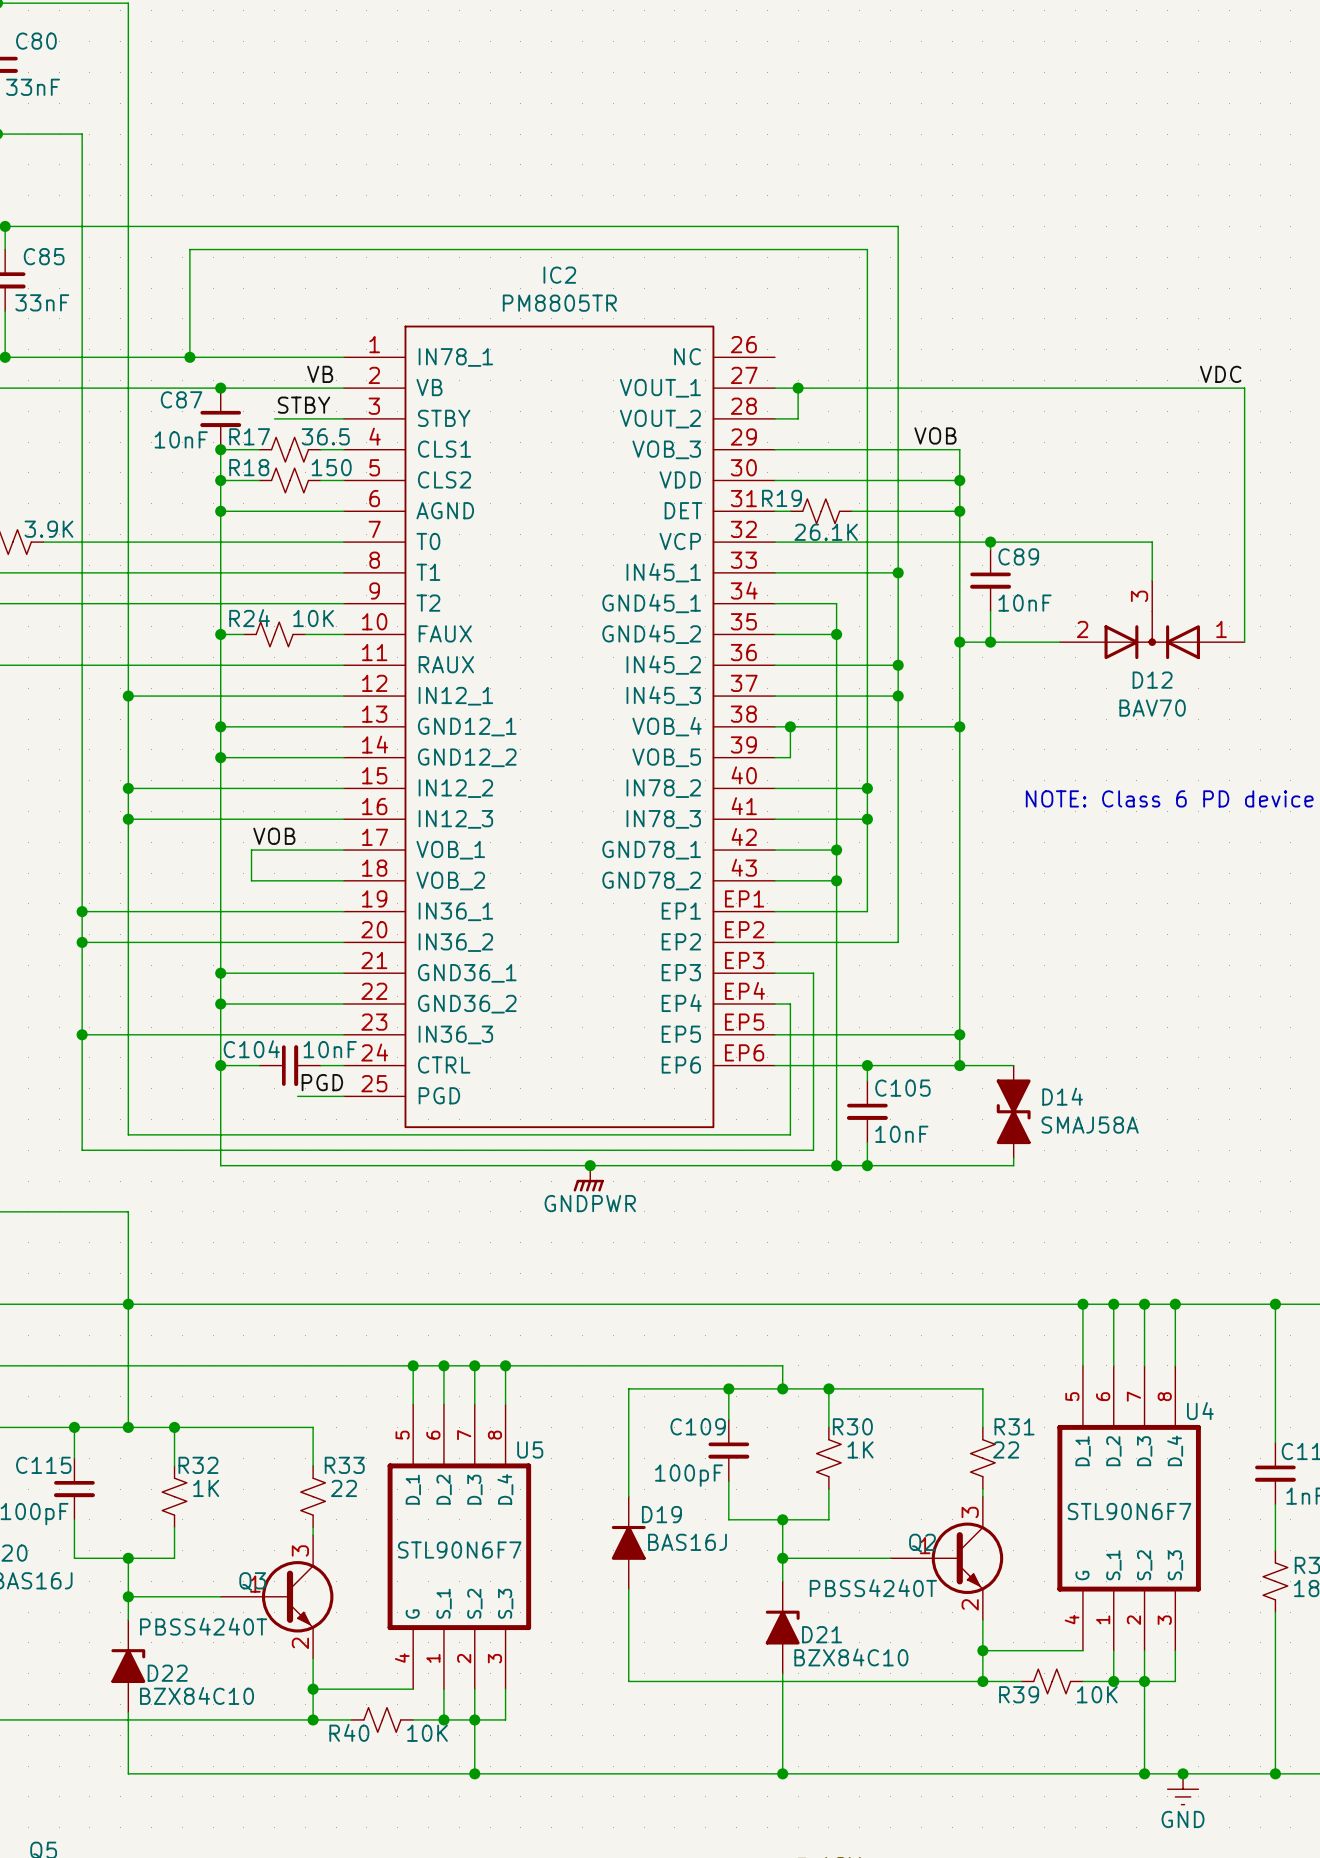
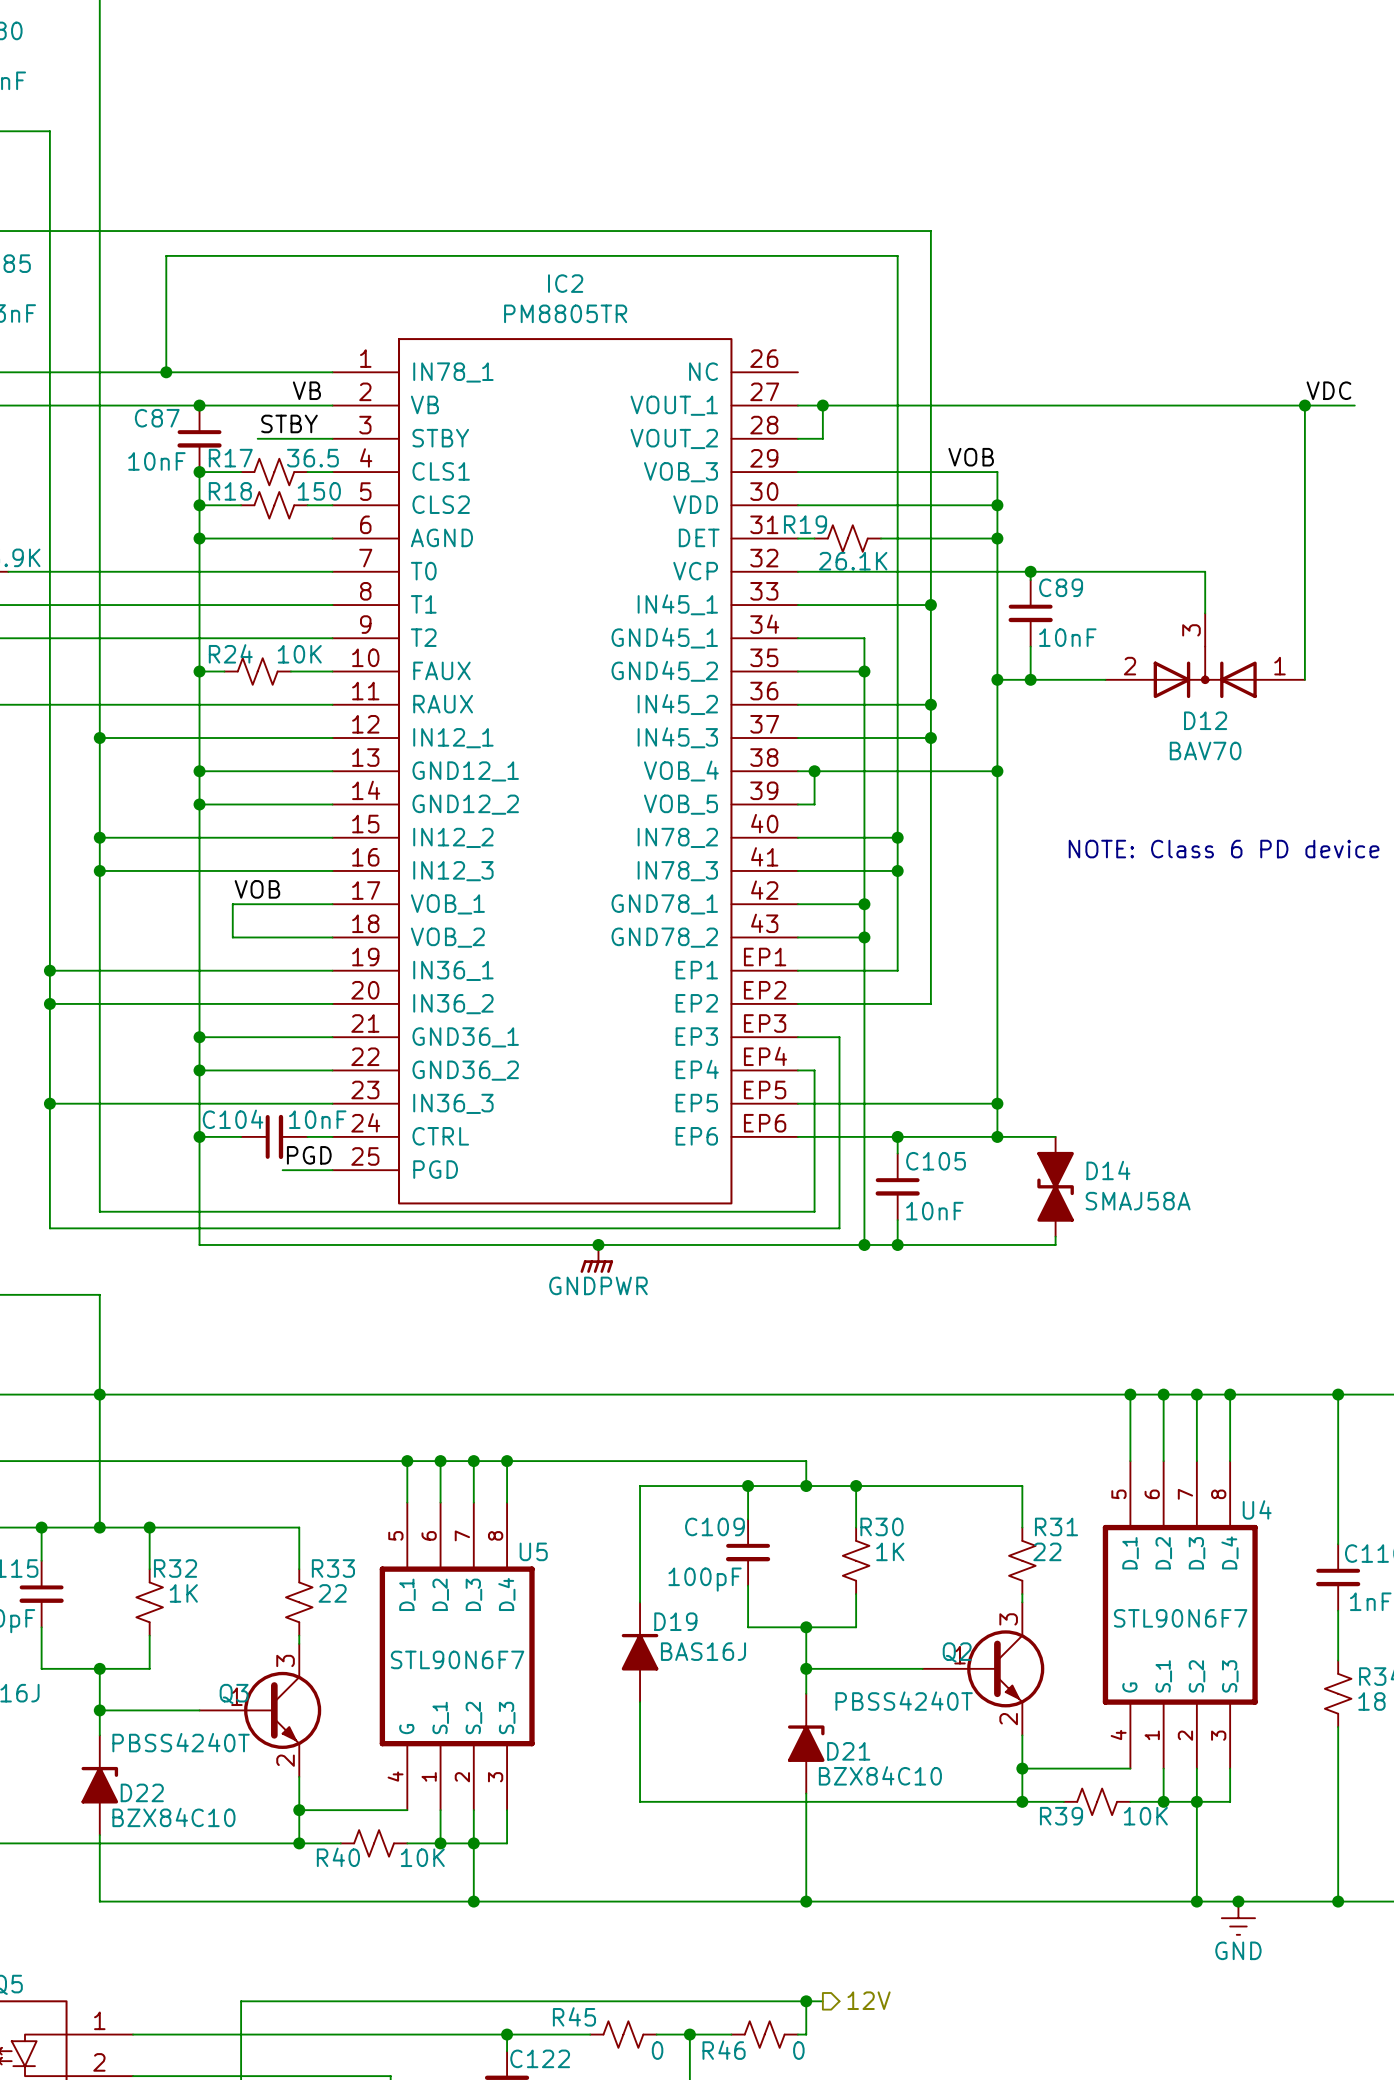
label position: VDC (1220, 374) -> VDC (1328, 390)
wire: none -> (1304, 405) (1354, 405)
junction: none -> (1304, 405)

